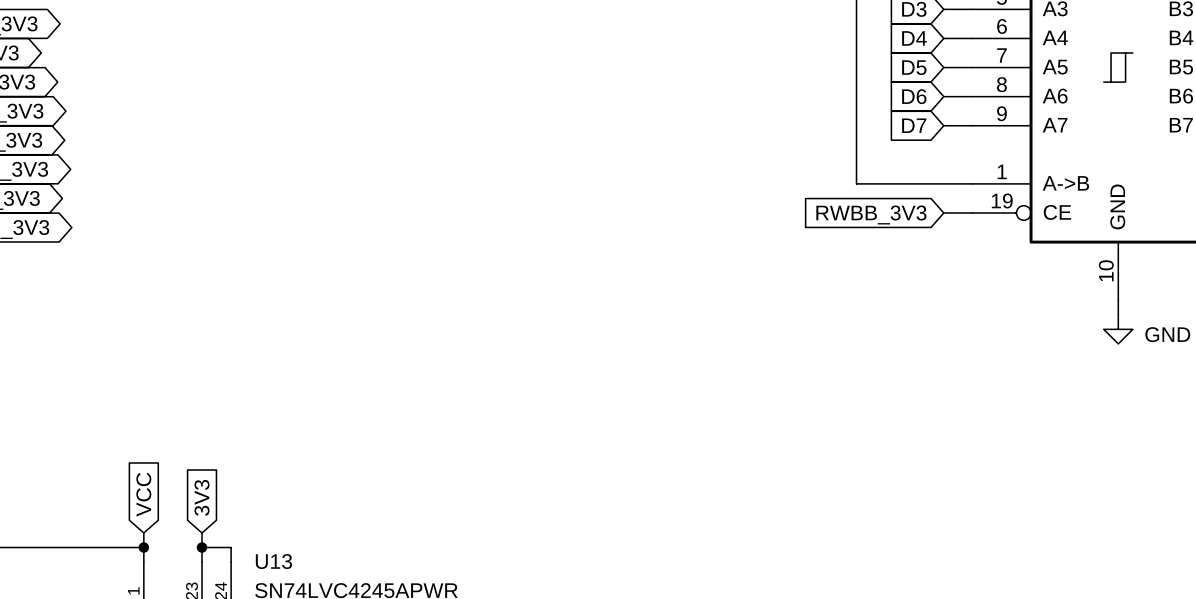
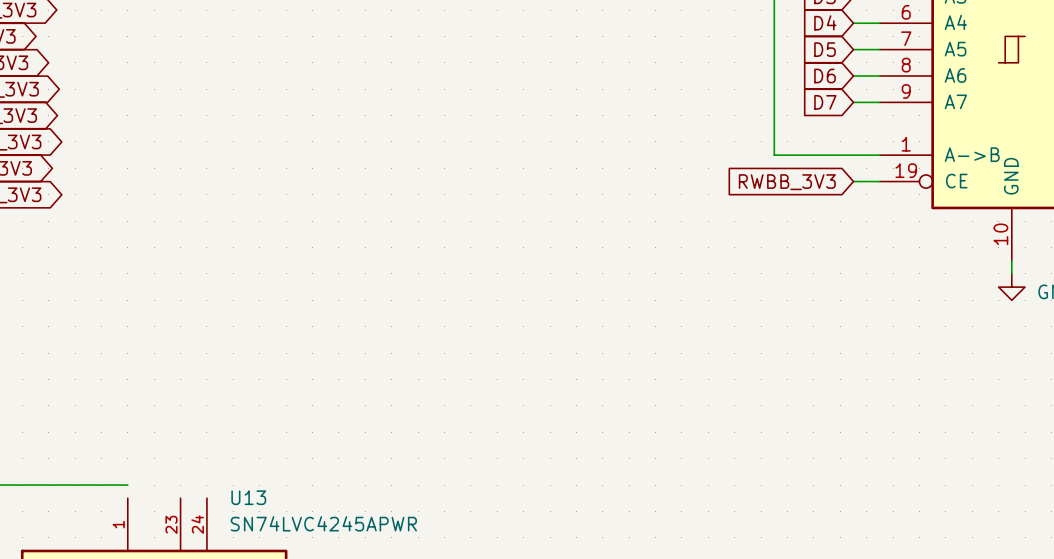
global label: VCC (143, 494) -> none
global label: 3V3 (202, 497) -> none
wire: (143, 532) (143, 562) -> none
wire: (202, 532) (202, 562) -> none
junction: (143, 547) -> none
wire: (202, 547) (231, 547) (231, 562) -> none
junction: (202, 547) -> none

